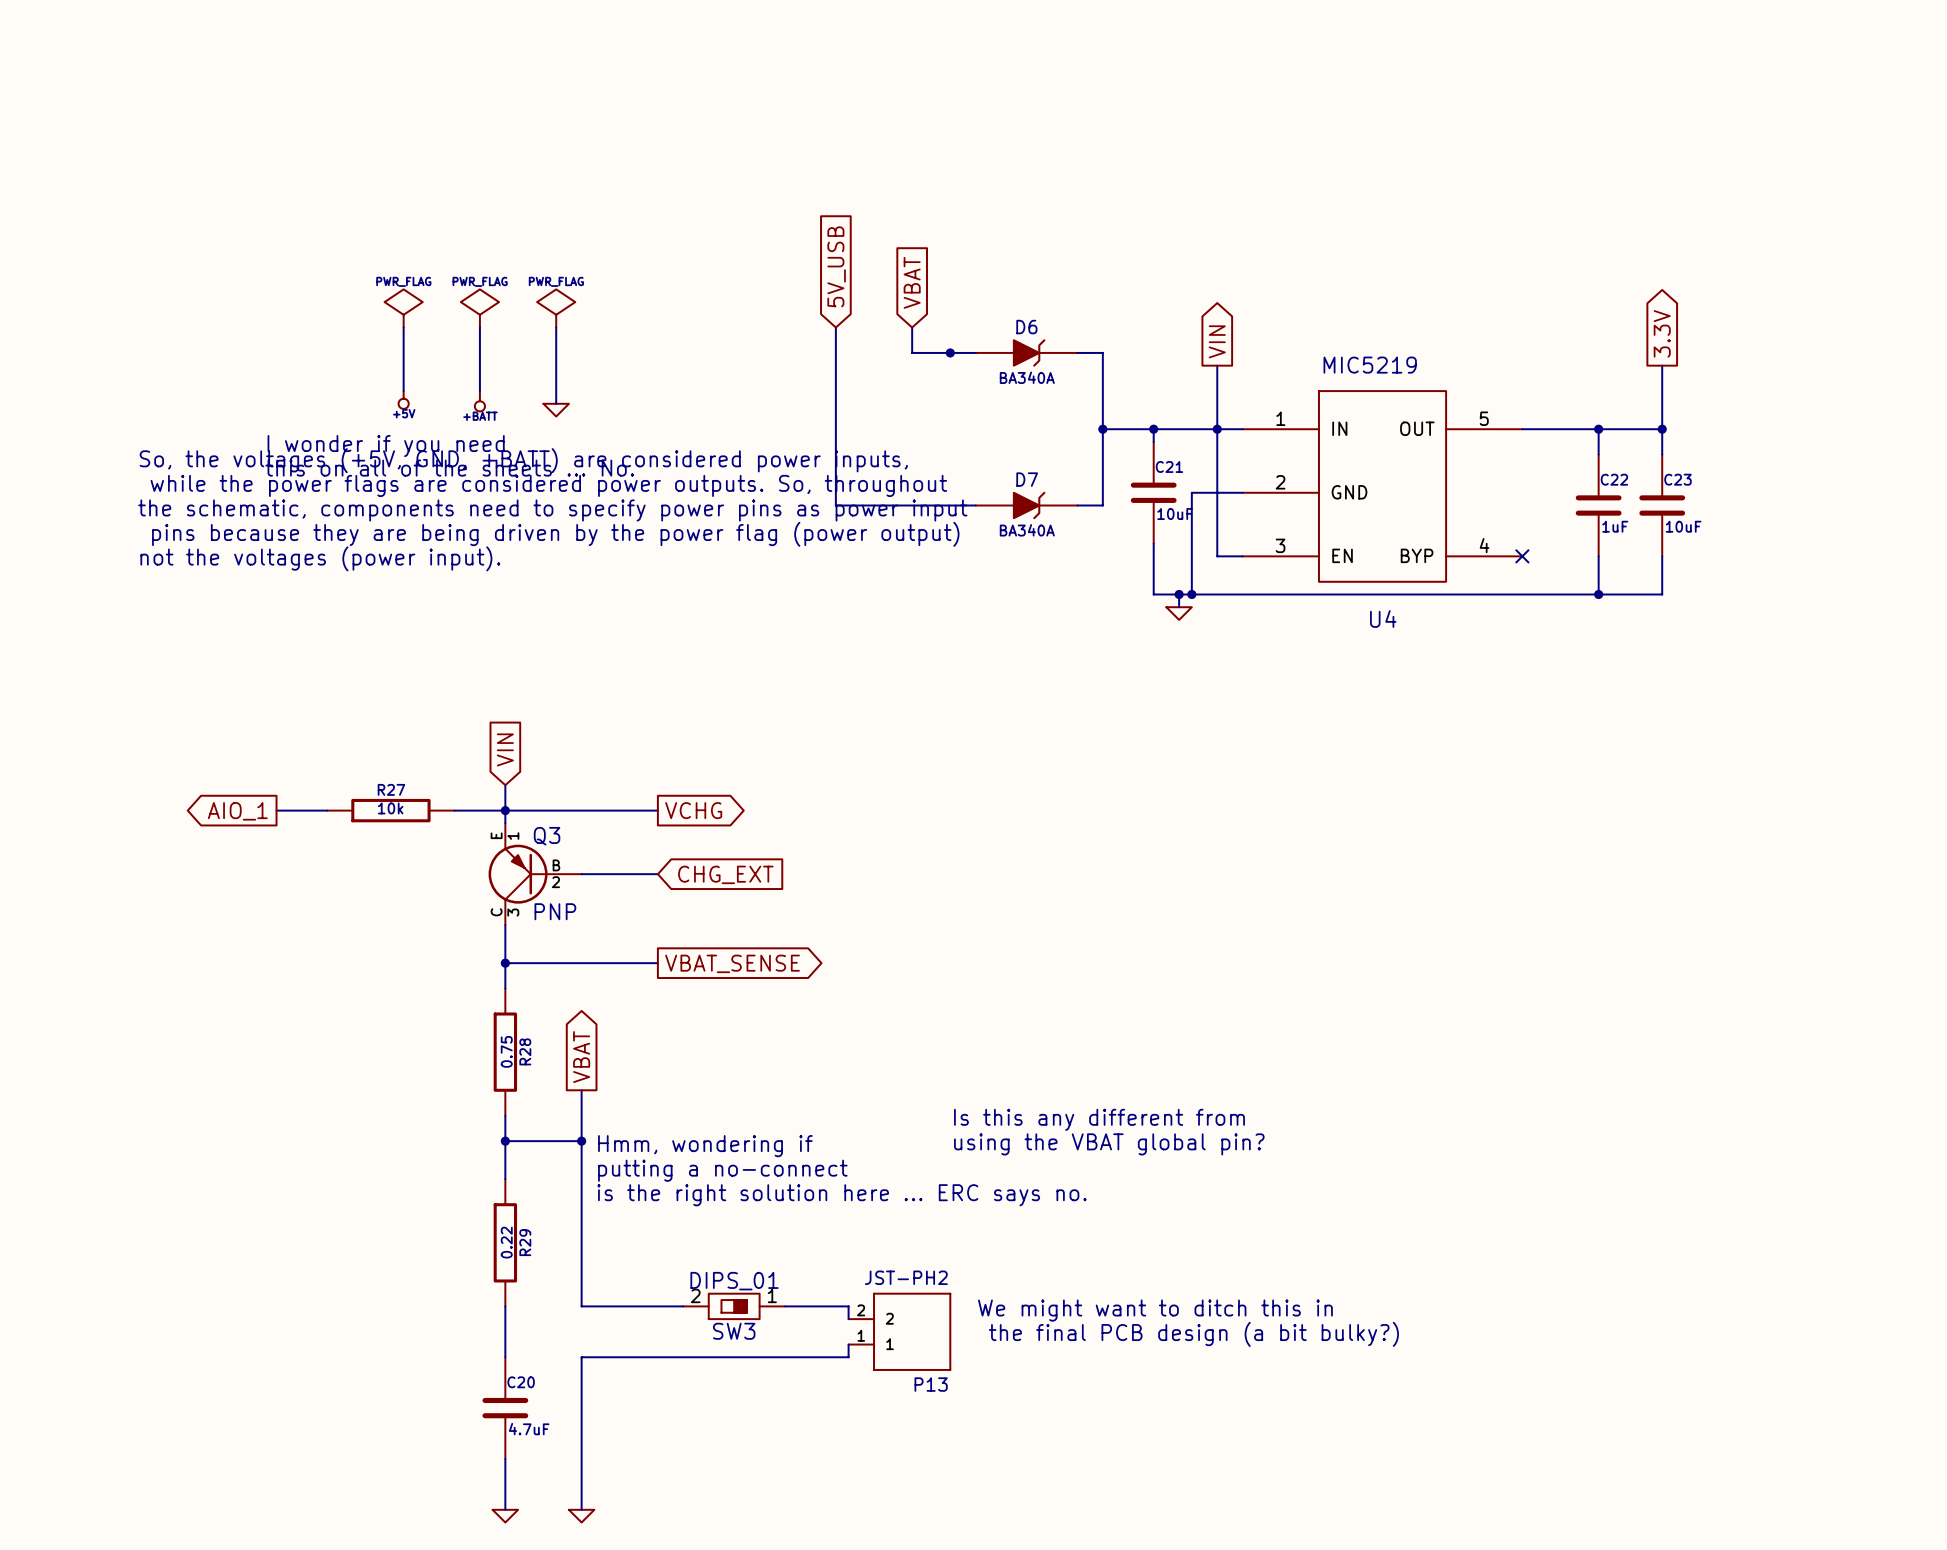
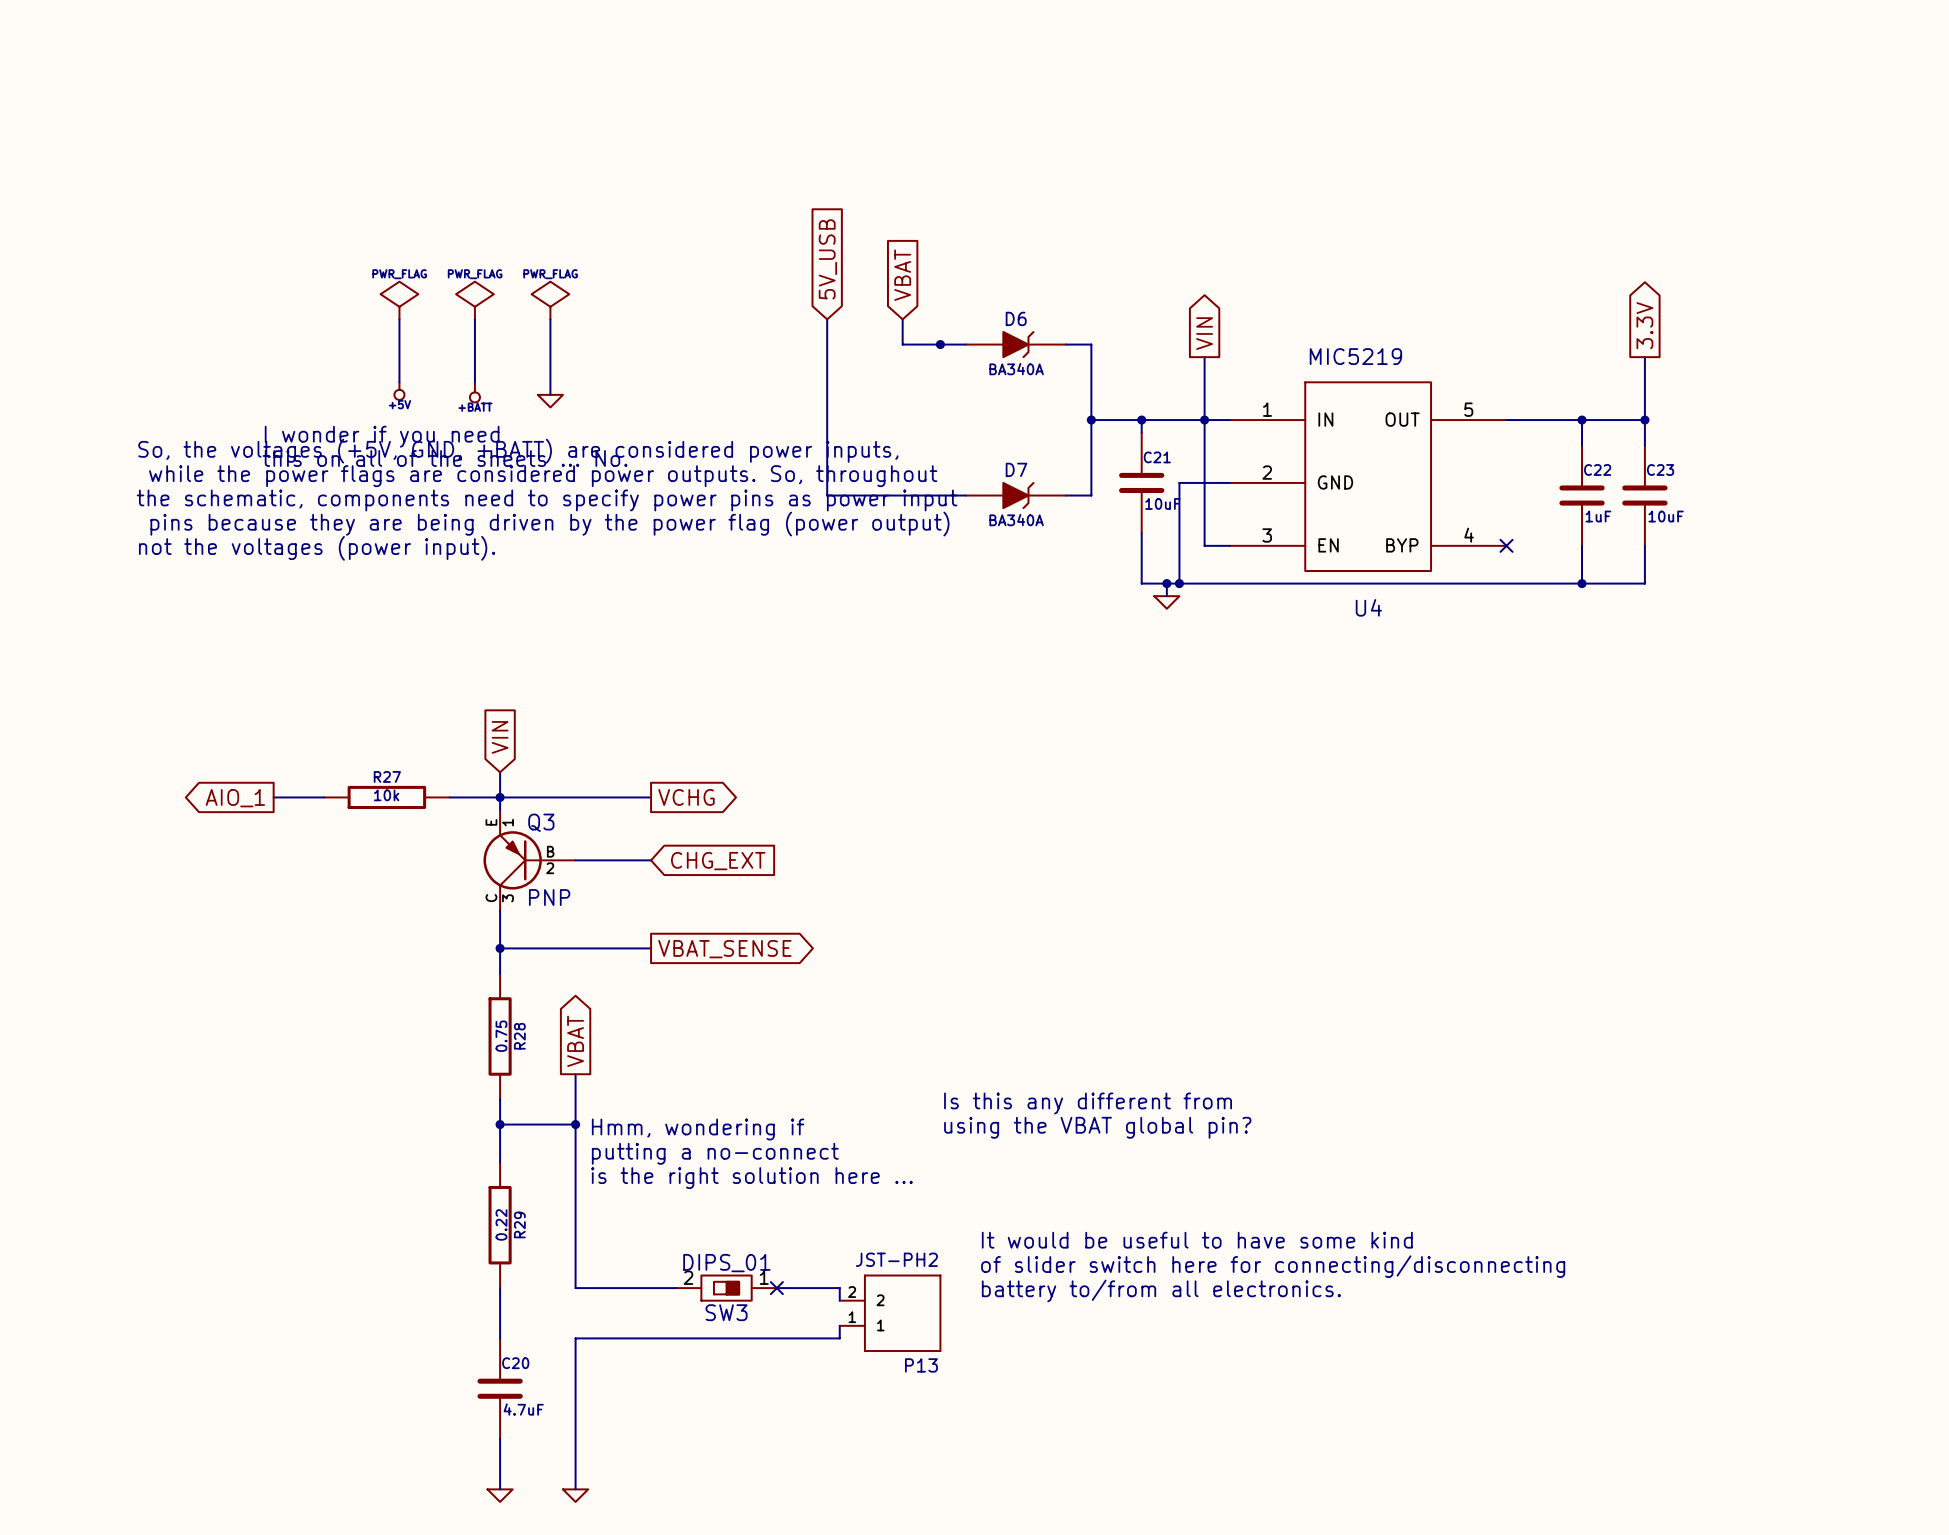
text: is the right solution here ... ERC says no. (841, 1195) -> is the right solution here ... (751, 1178)
text: none -> It would be useful to have some kind (1197, 1240)
text: none -> of slider switch here for connecting/disconnecting (1273, 1266)
no-connect mark: none -> (776, 1288)
text: none -> battery to/from all electronics. (1161, 1290)
text: We might want to ditch this in (1155, 1310) -> none
text: the final PCB design (a bit bulky?) (1193, 1334) -> none

